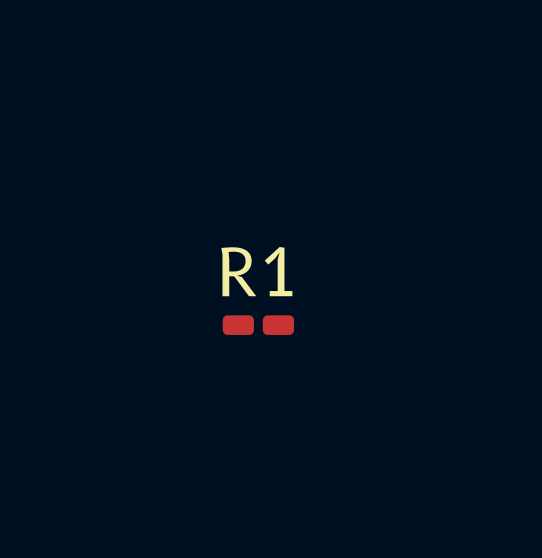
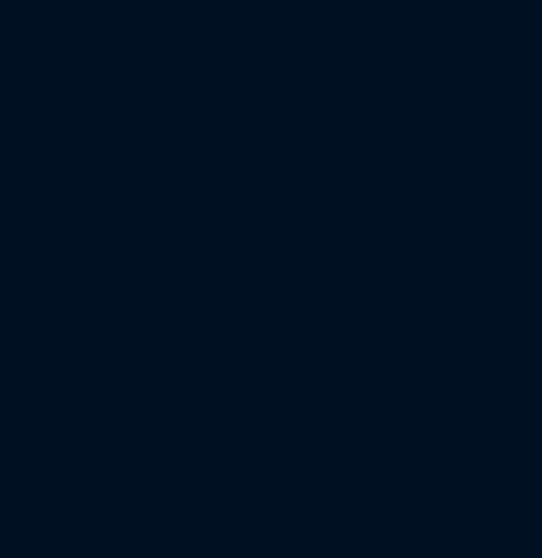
R1: (258, 325) -> none

